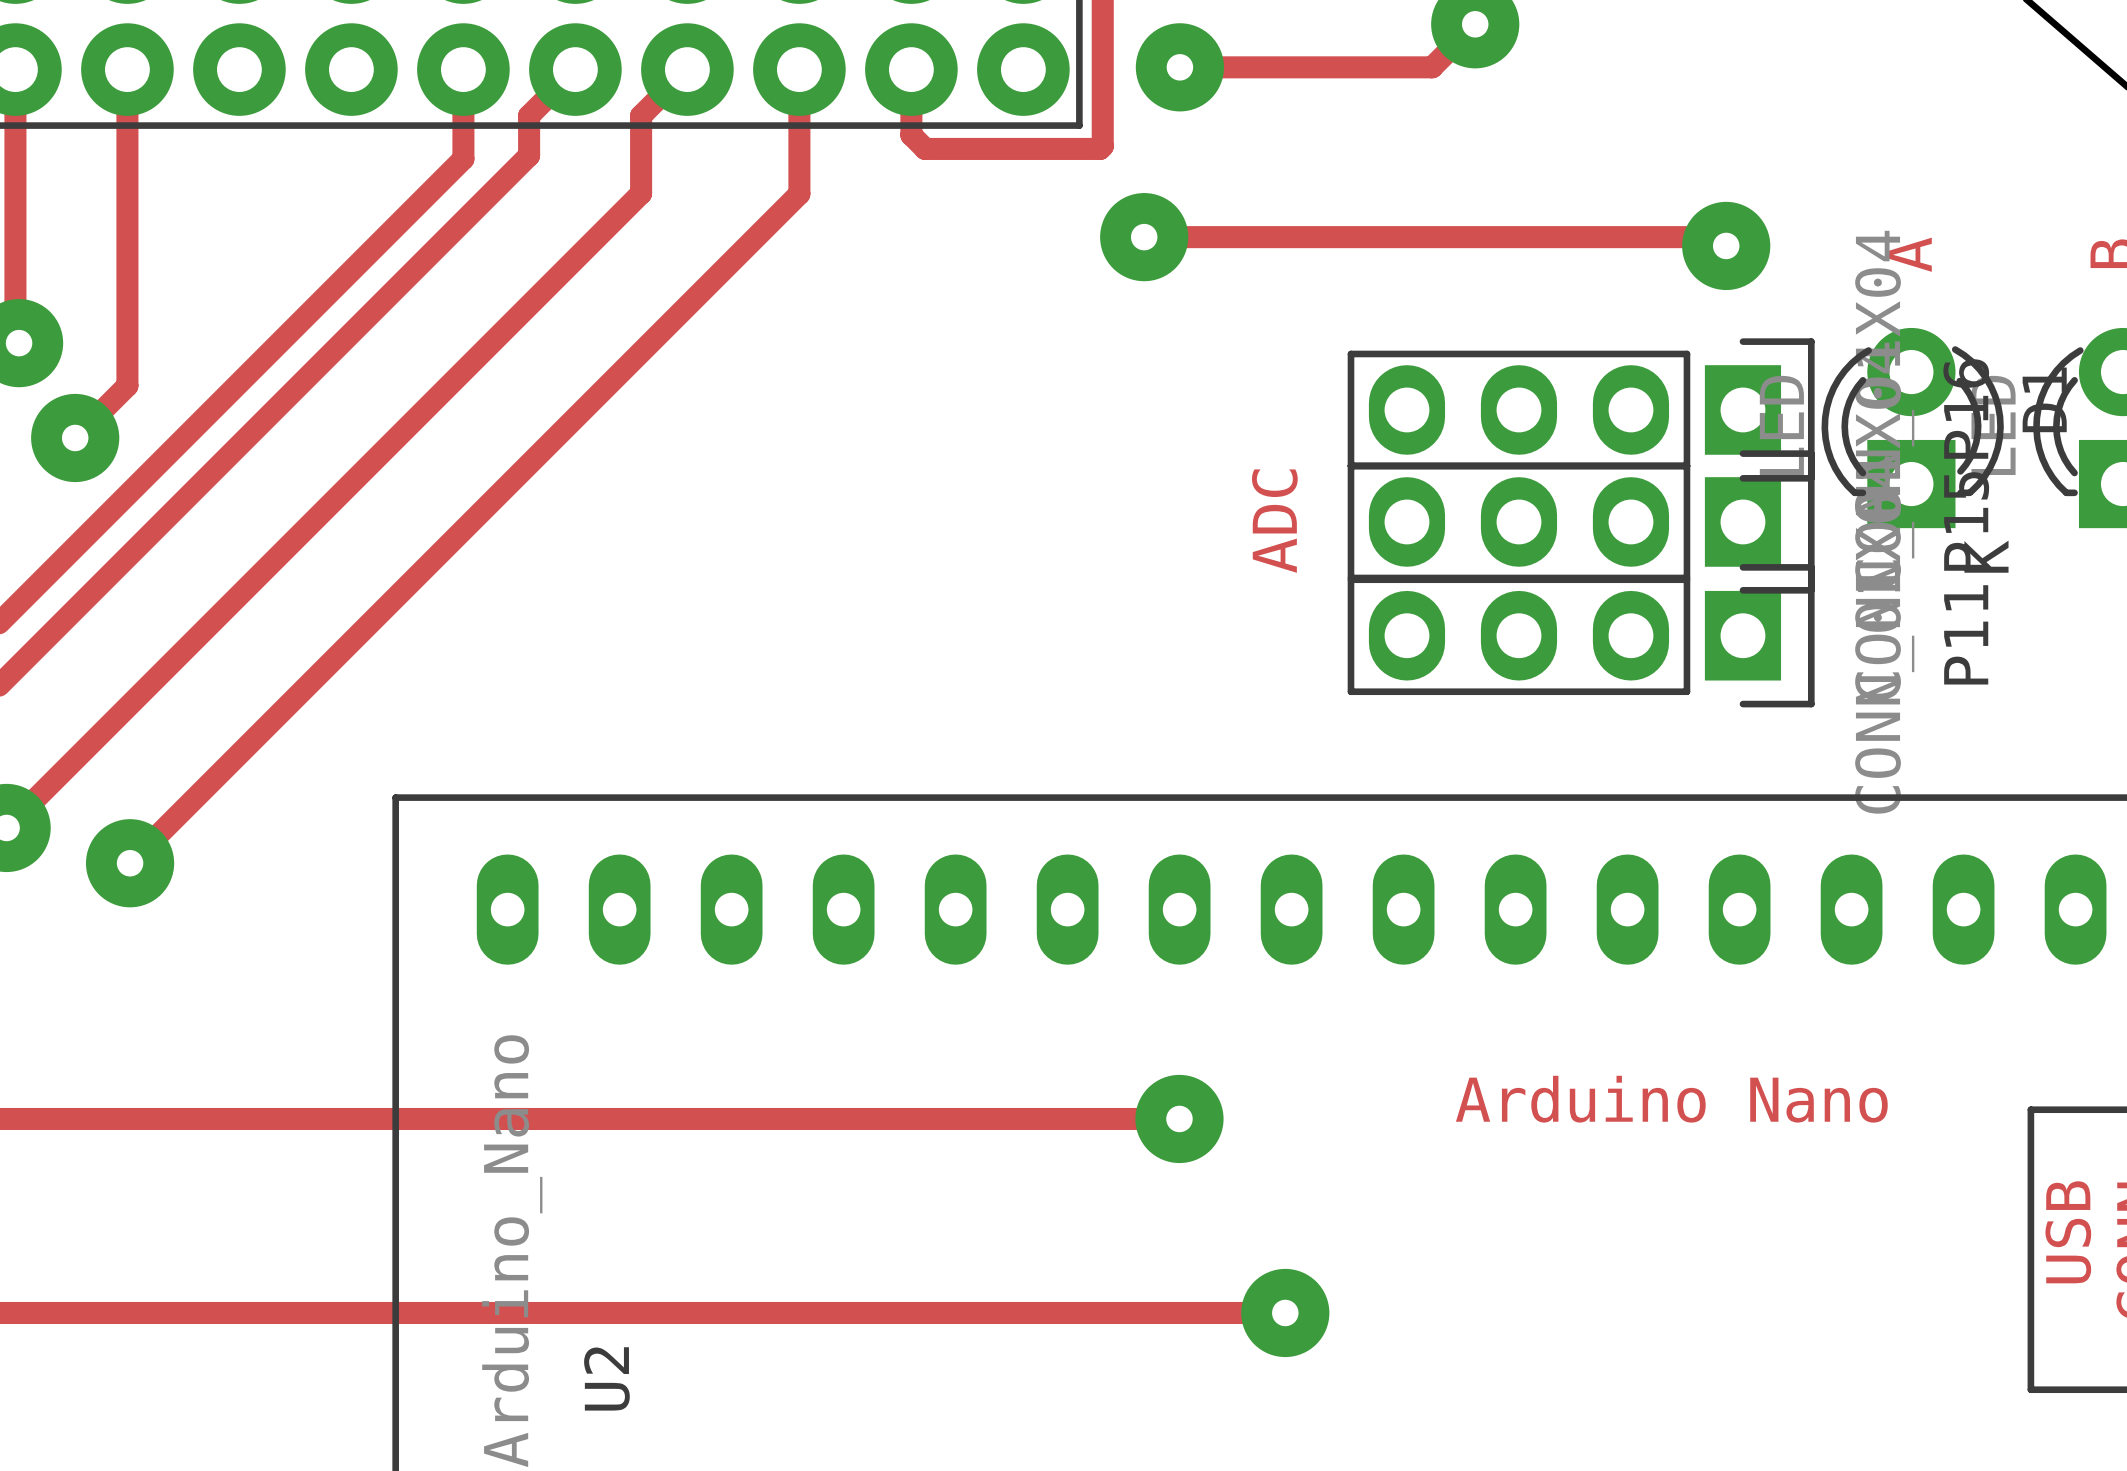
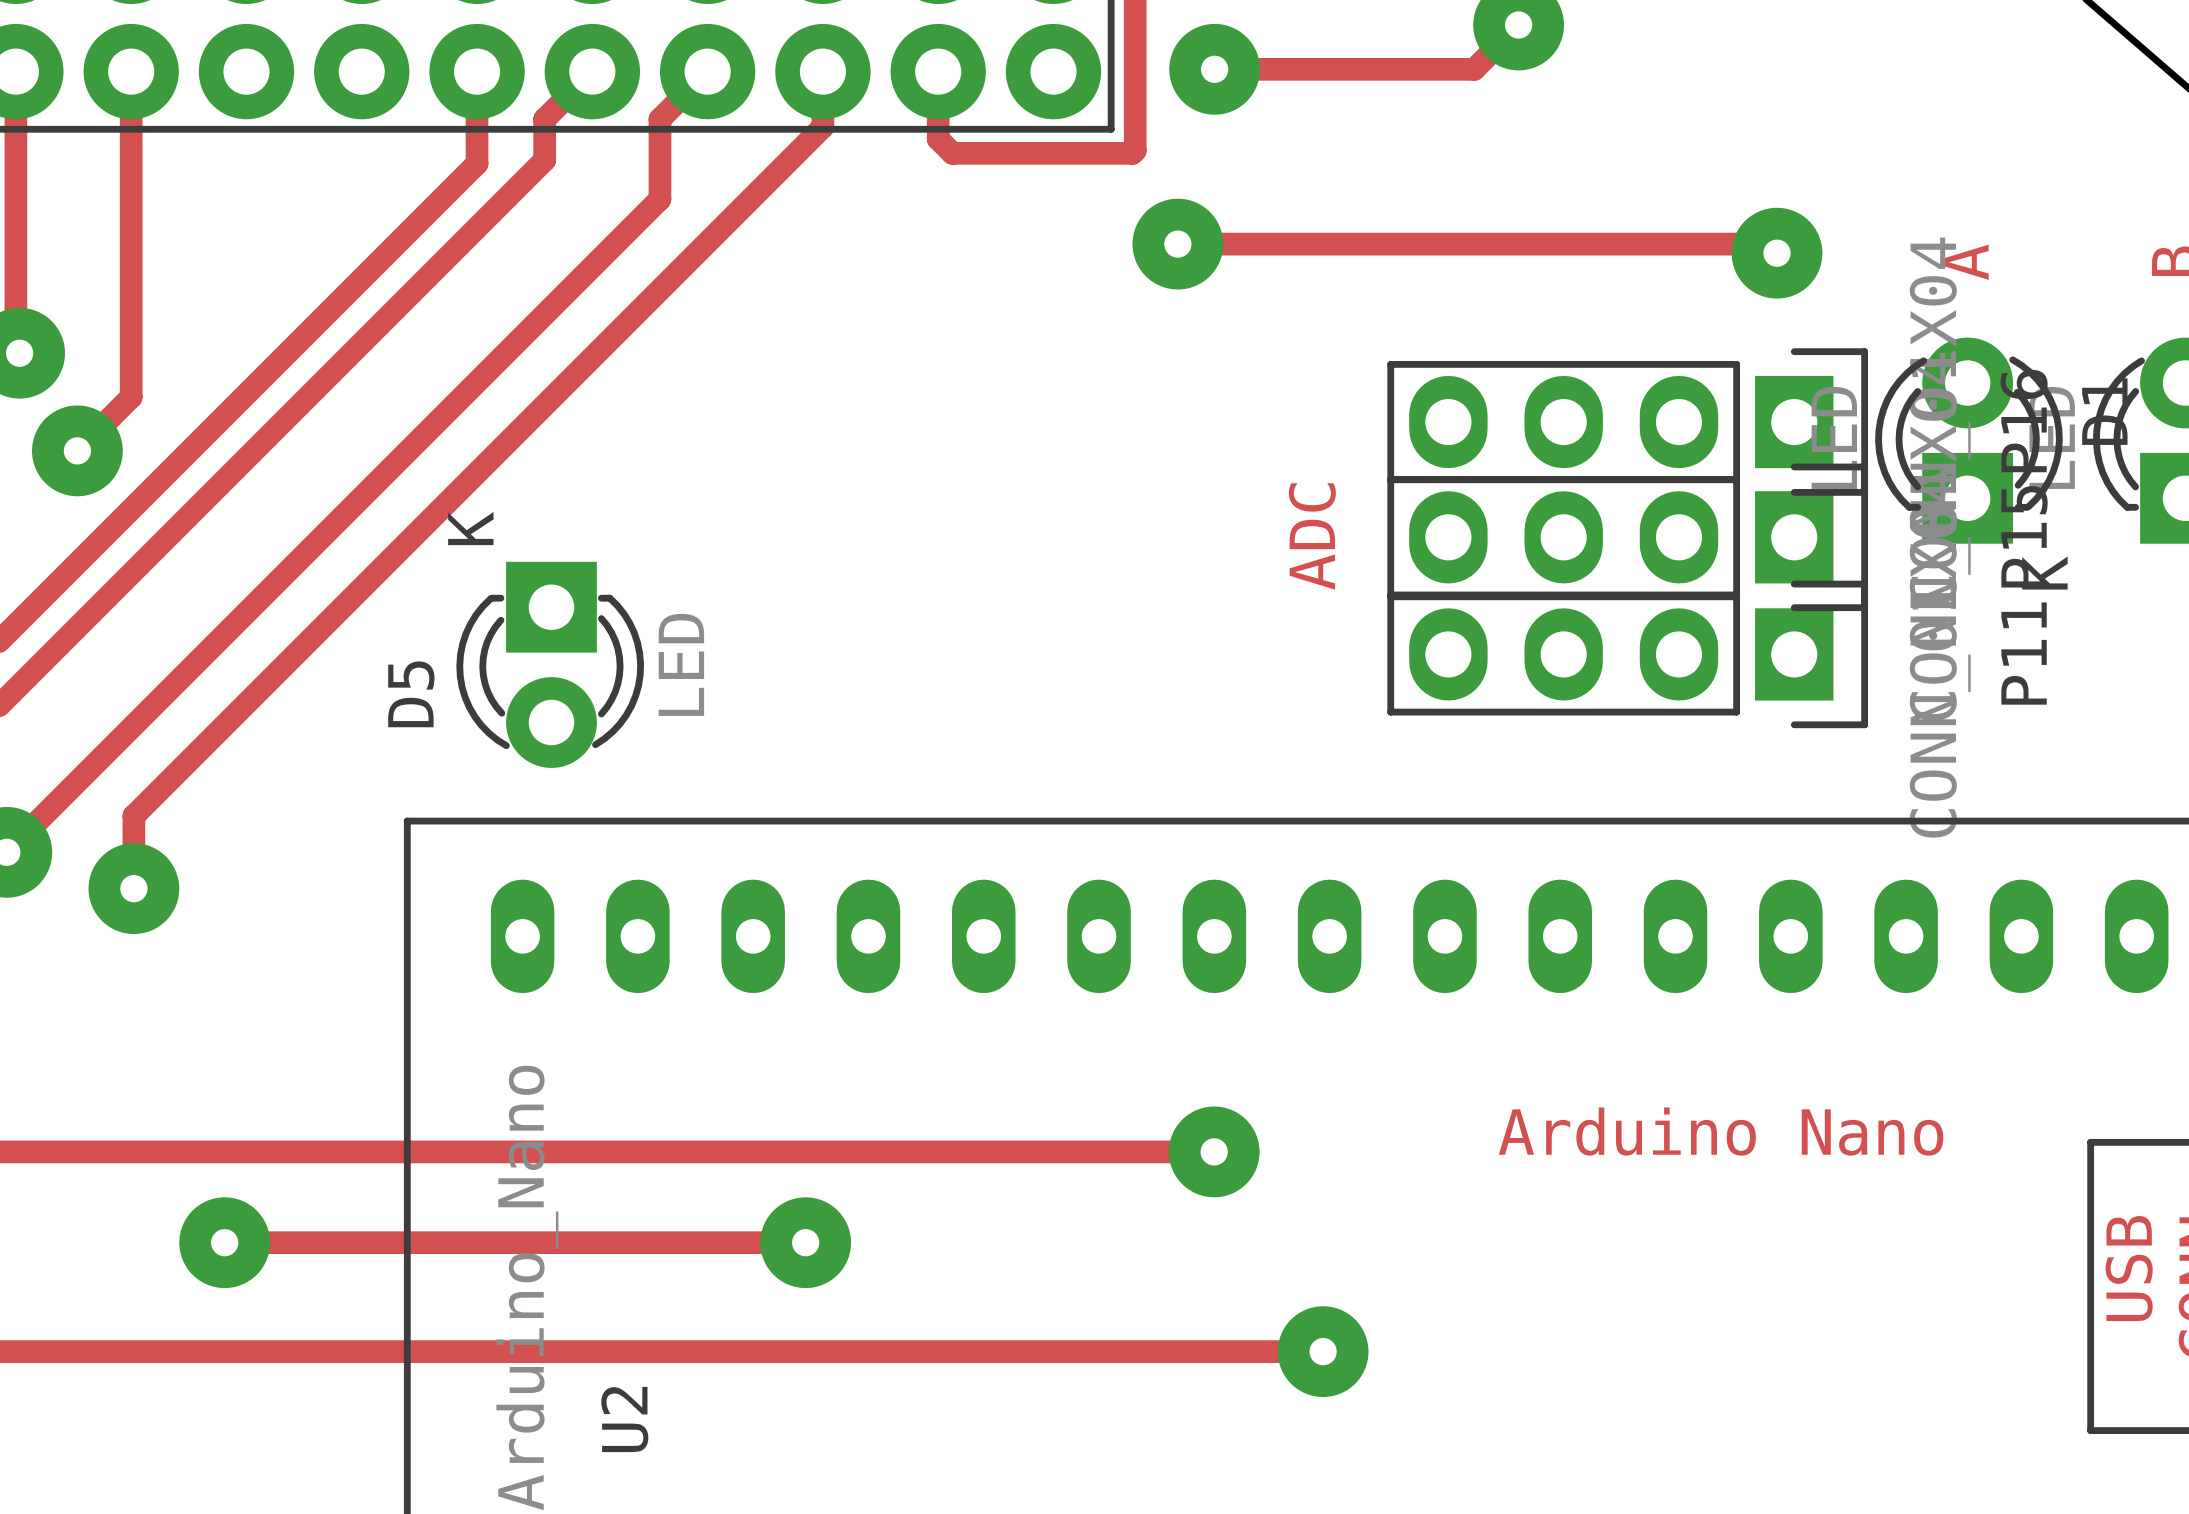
track: (799, 123) (799, 193) (130, 863) -> (822, 127) (133, 816) (133, 888)
D5: none -> LED (550, 664)
track: none -> (224, 1242) (805, 1242)
via: none -> (224, 1242)
via: none -> (805, 1242)

